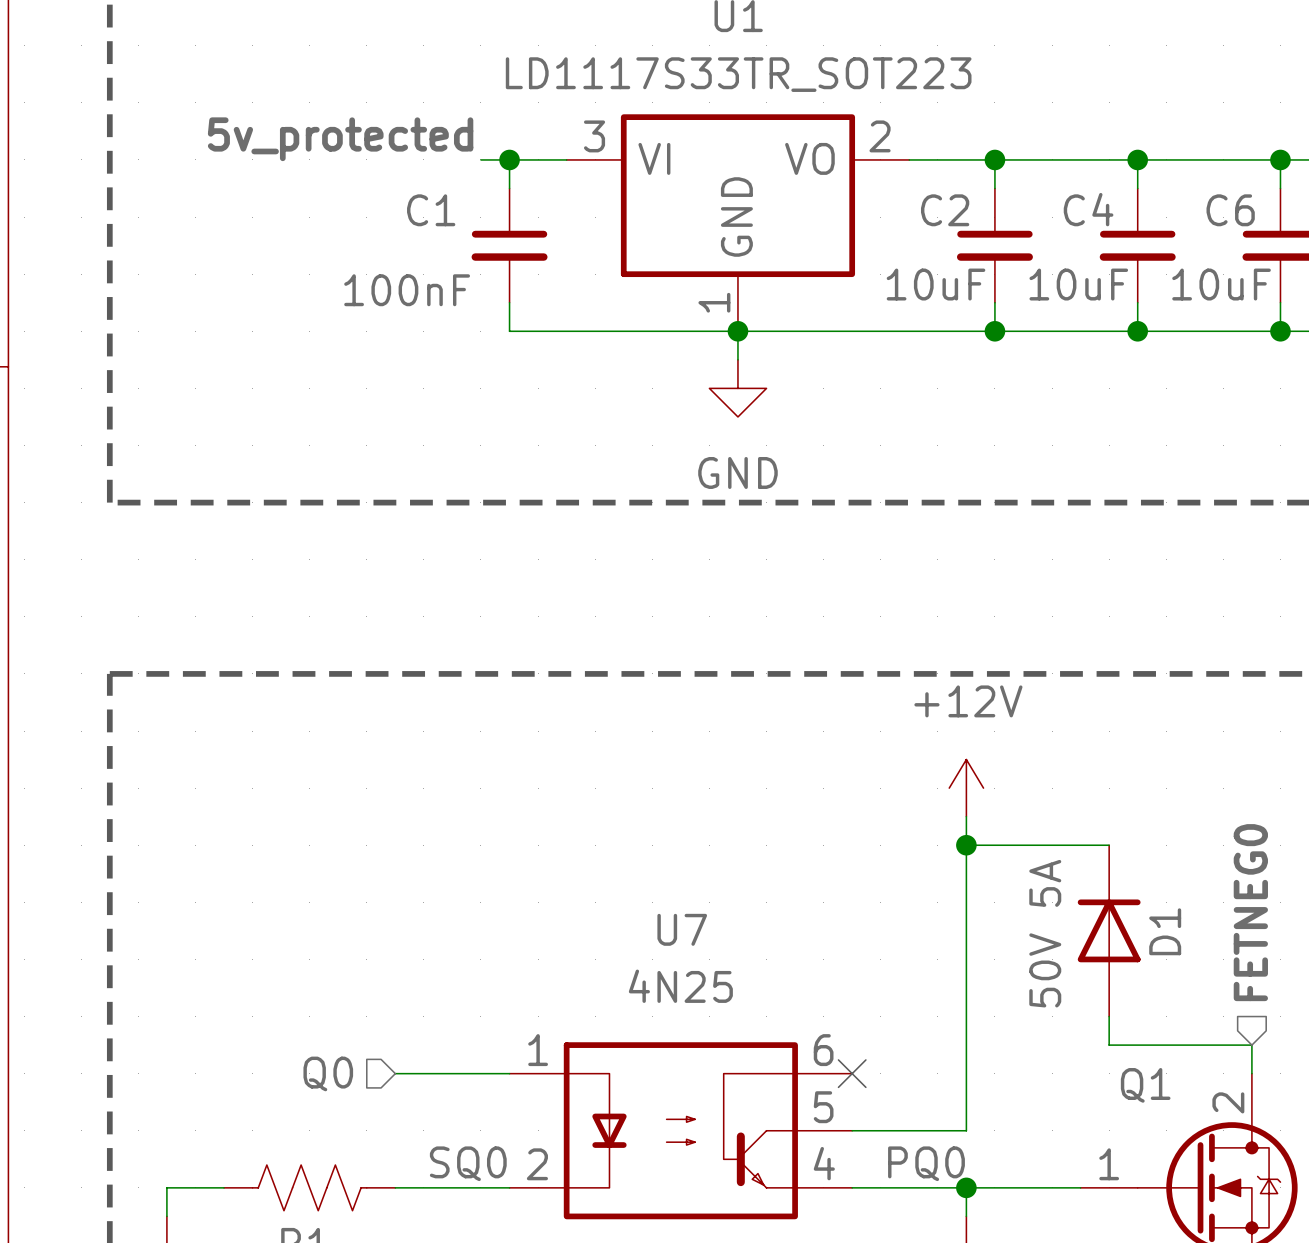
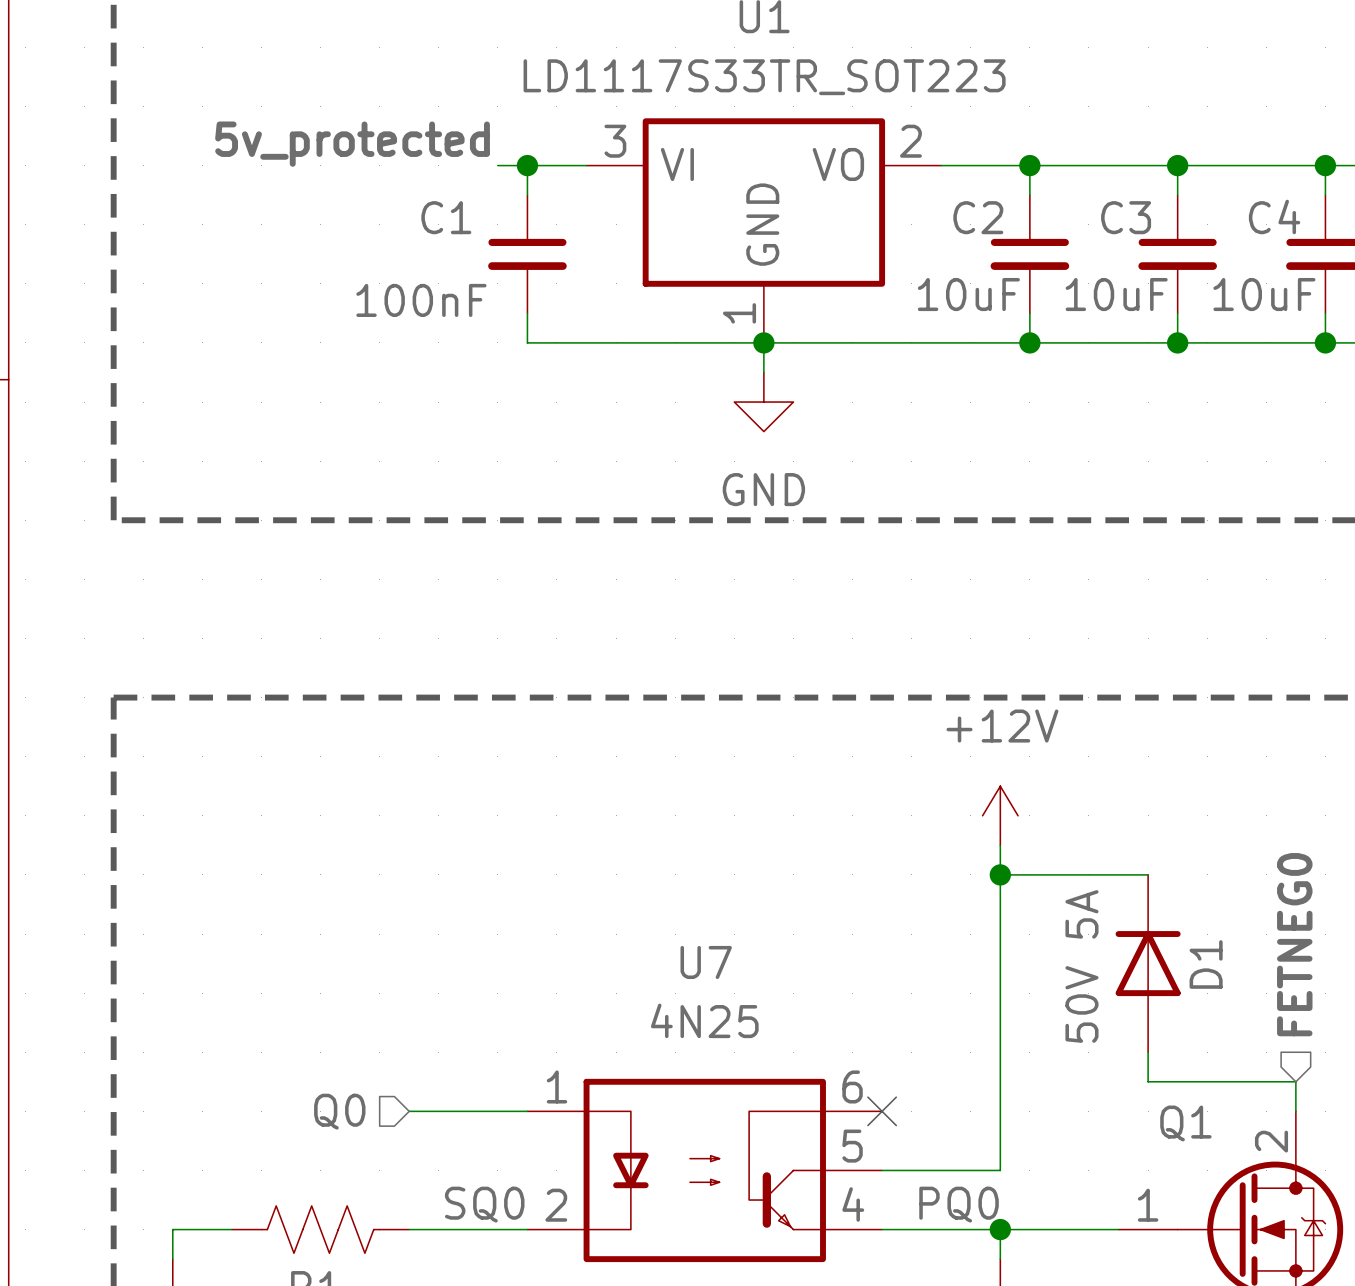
C4 name: C4 (1088, 209) -> C3 (1126, 217)
C6 name: C6 (1230, 210) -> C4 (1274, 216)

